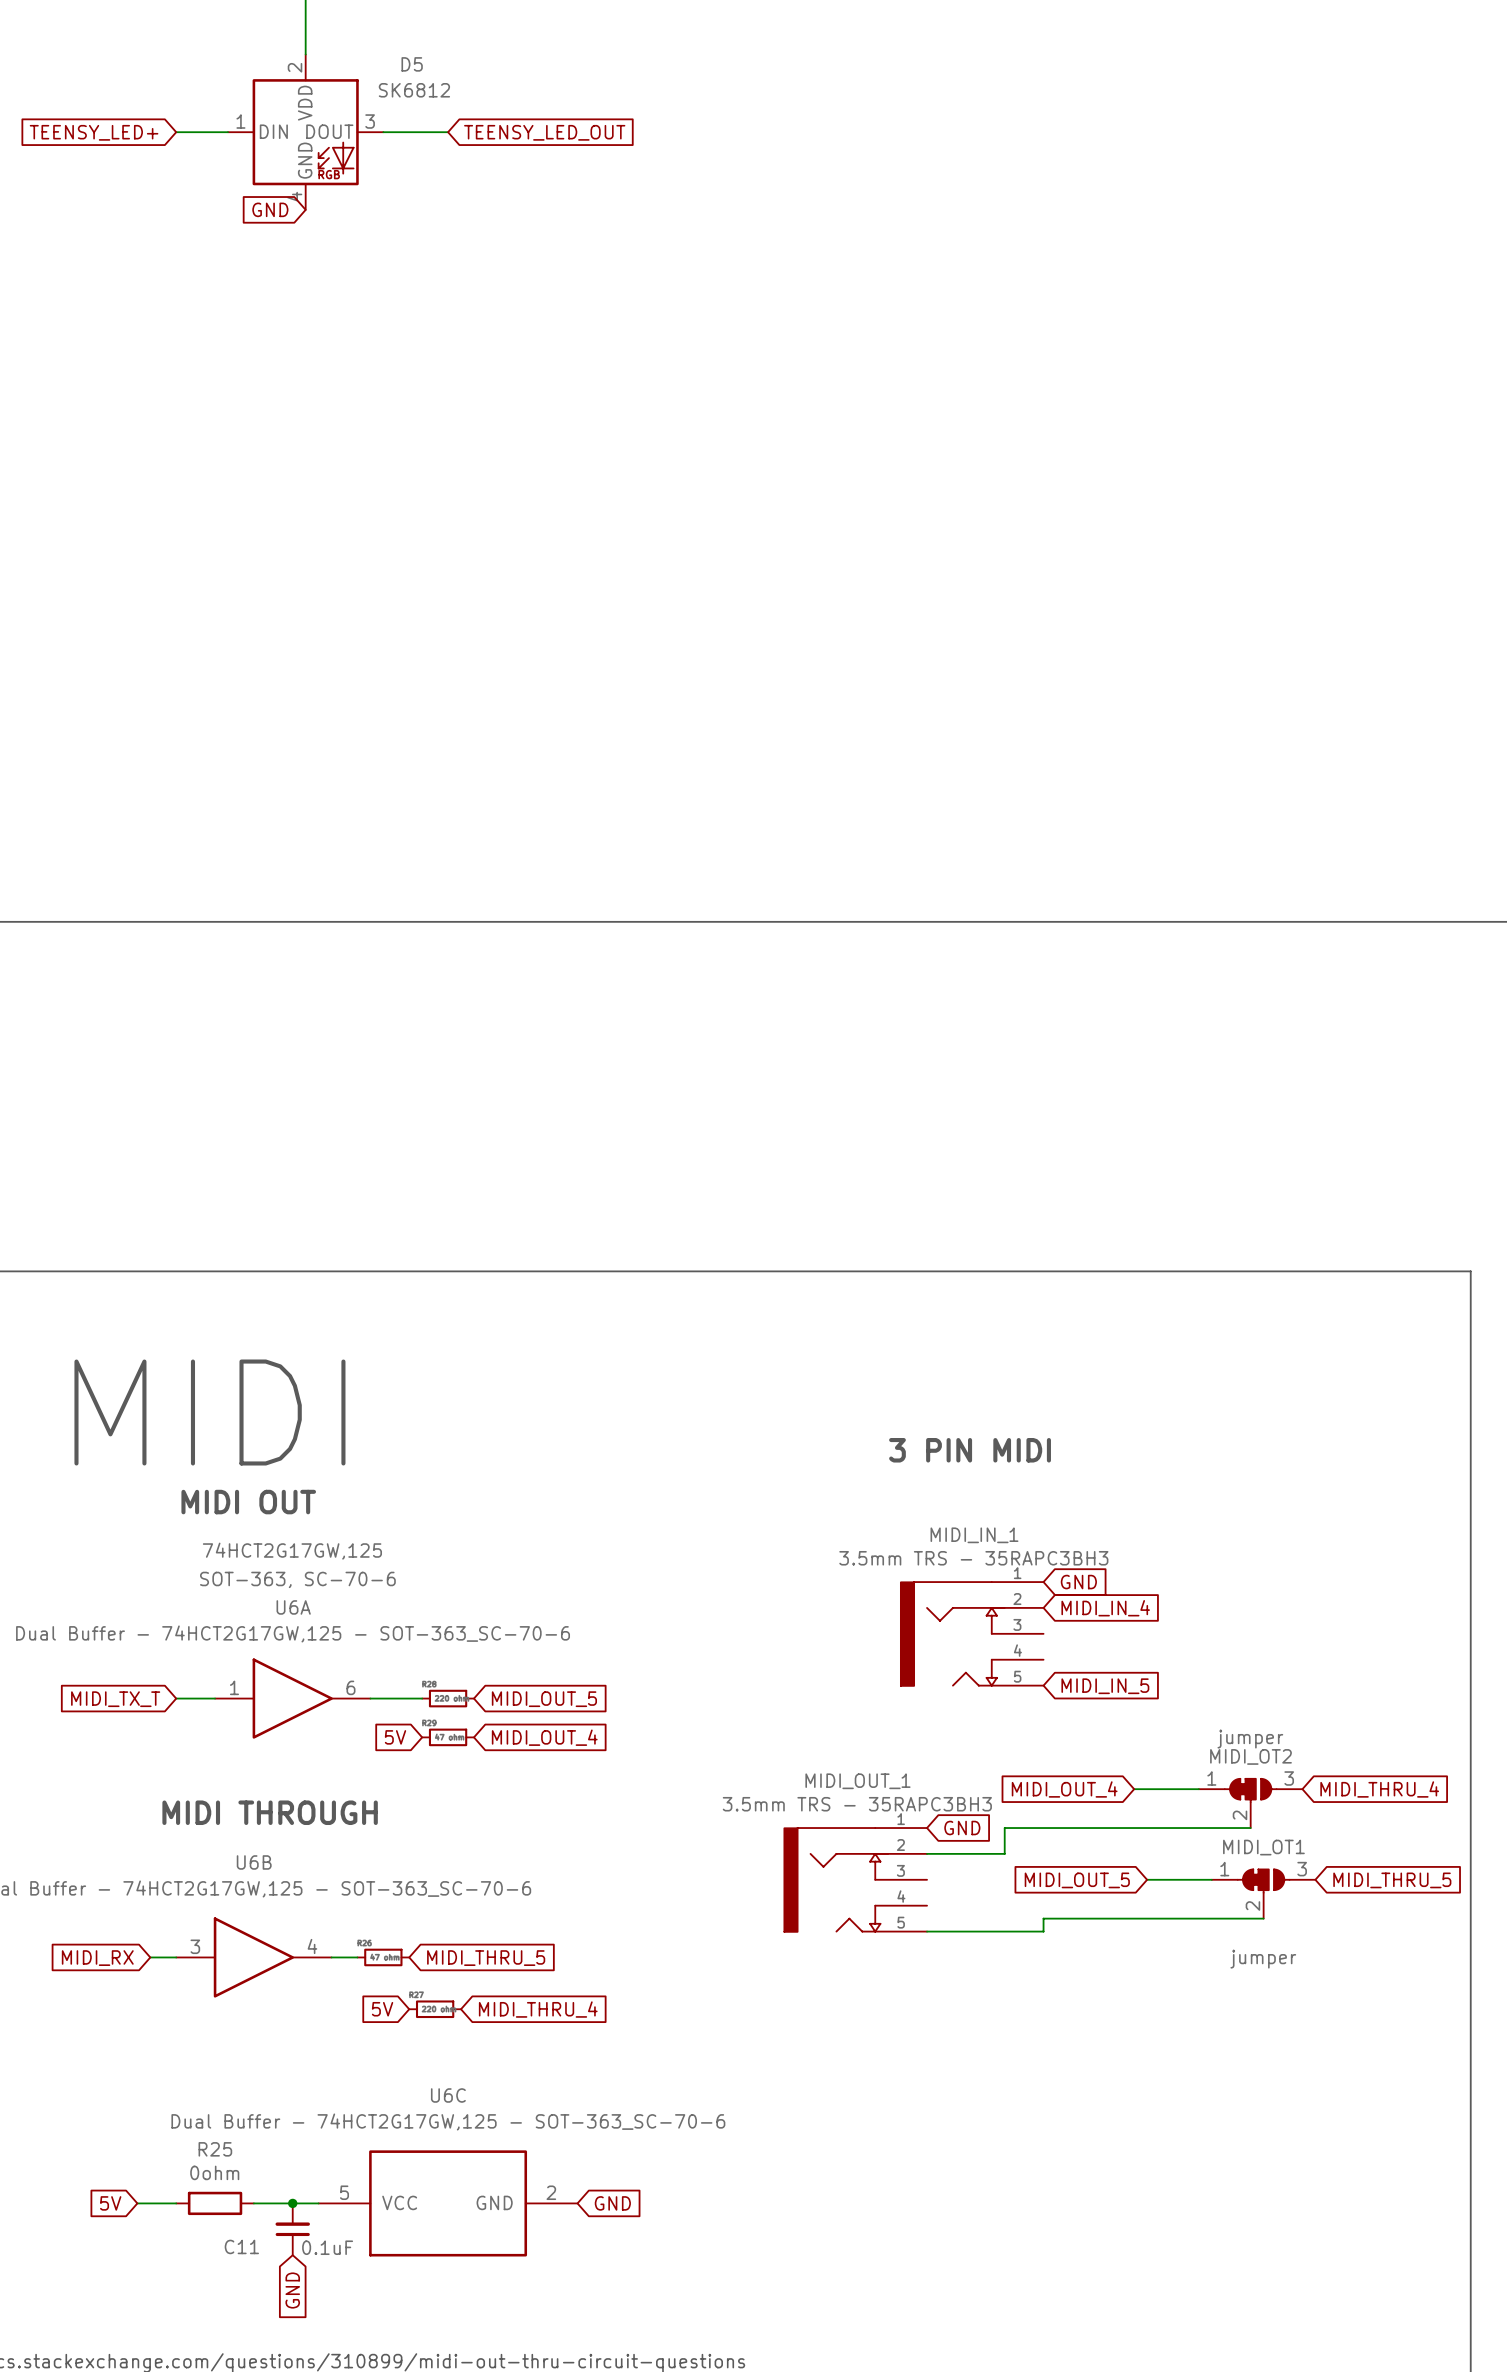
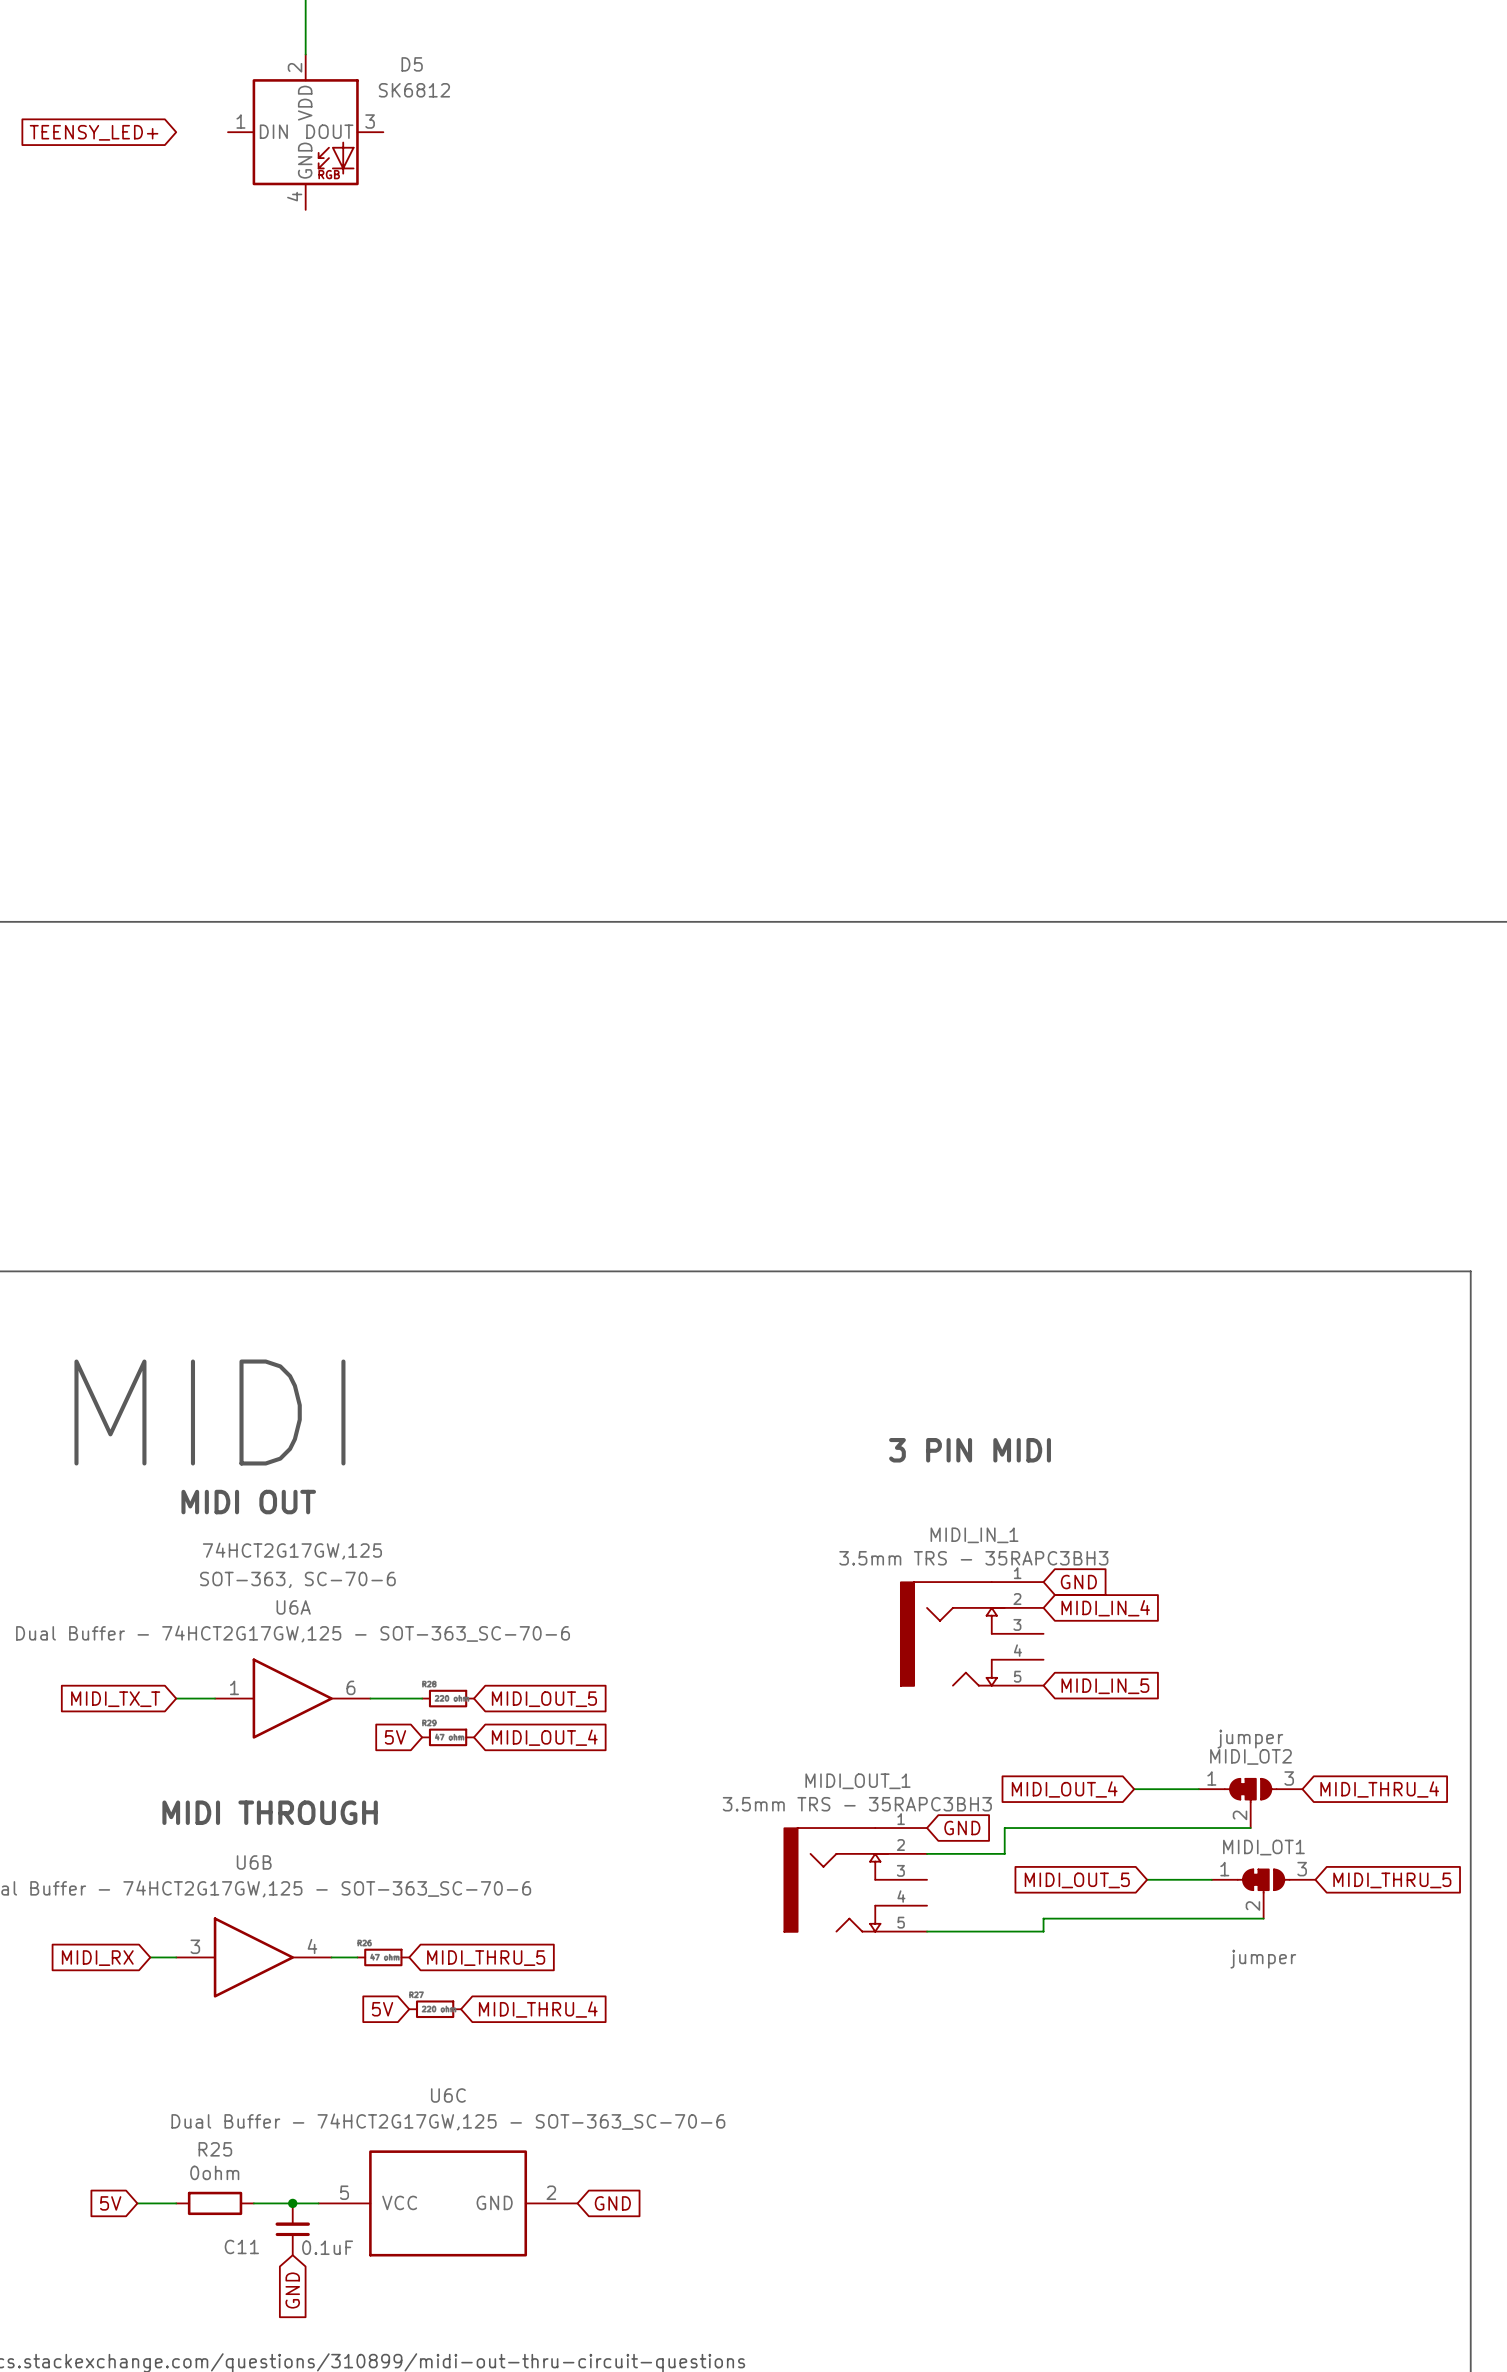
wire: (176, 132) (228, 132) -> none
wire: (383, 132) (448, 132) -> none
global label: TEENSY_LED_OUT (544, 132) -> none
global label: GND (270, 209) -> none

